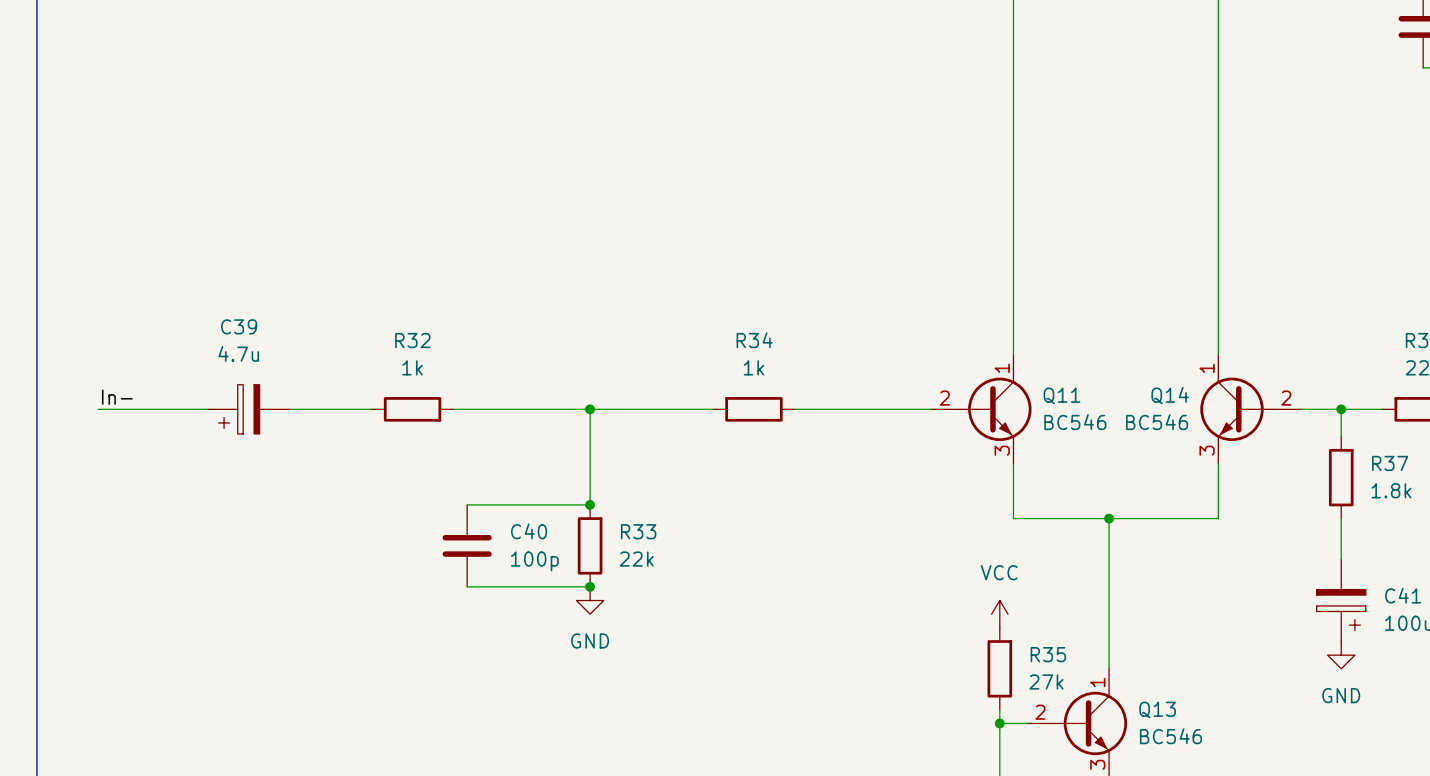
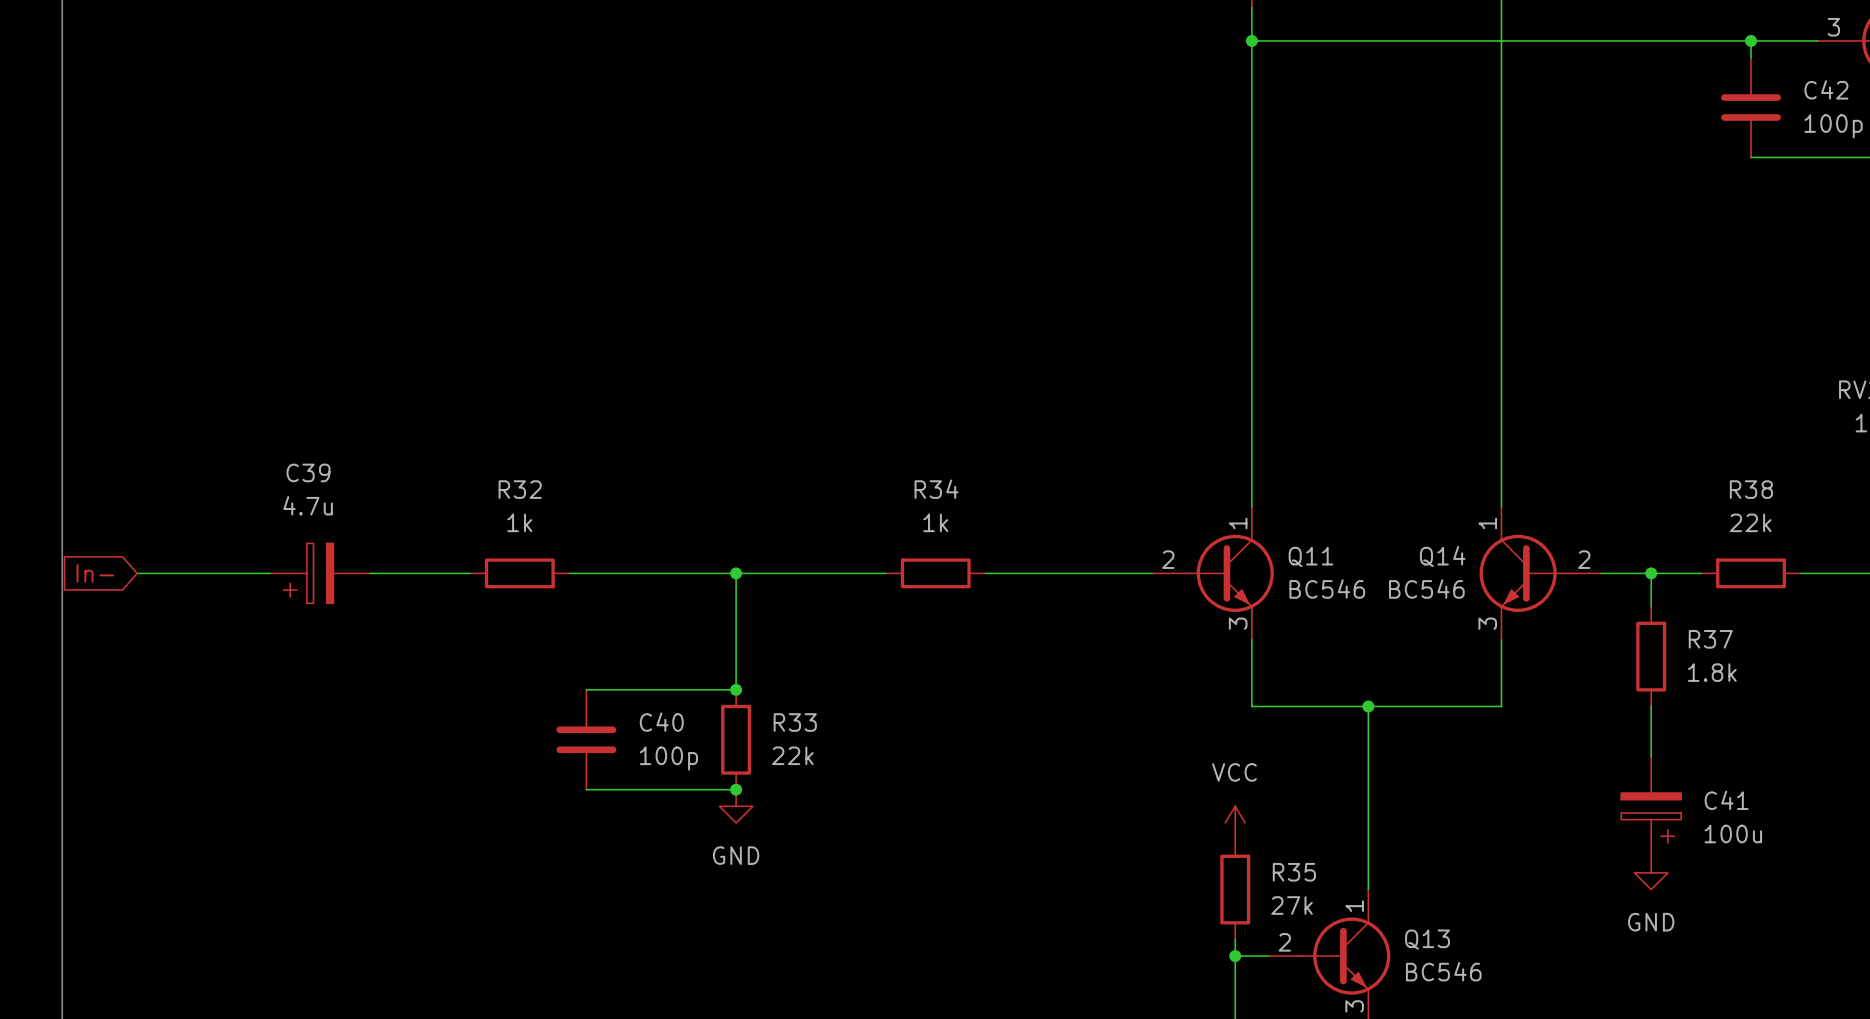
label: In- (117, 397) -> none
global label: none -> In- (95, 573)

